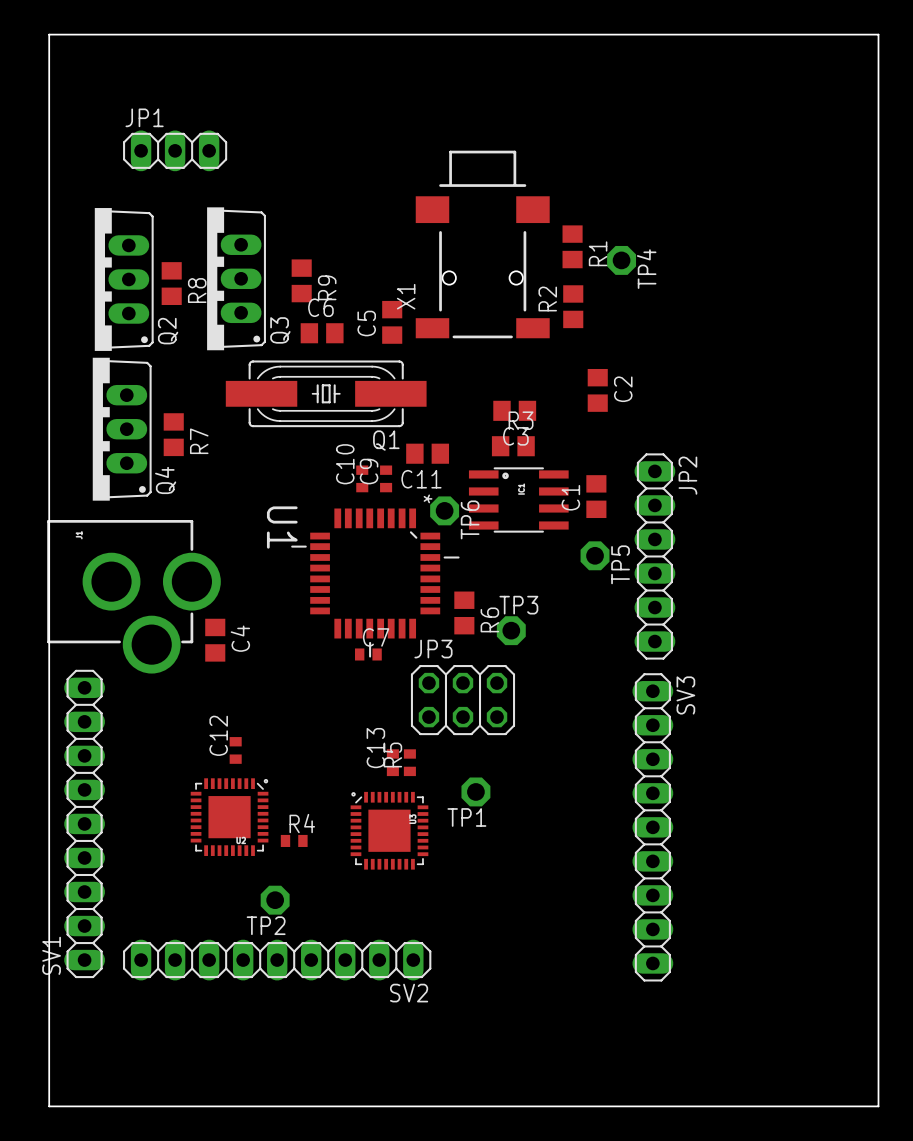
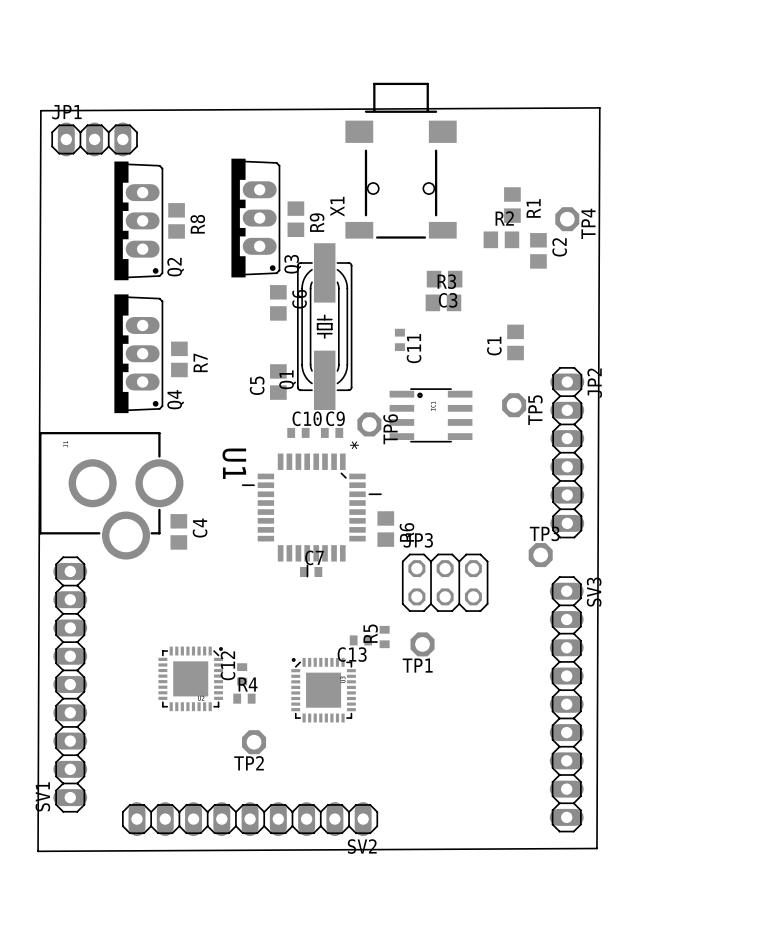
board edge: (49, 34) (878, 34) (878, 1106) (49, 1106) (49, 34) -> (599, 107) (40, 110) (38, 851) (596, 848) (599, 107)
JP1 position: (175, 150) -> (94, 139)
X1 position: (482, 244) -> (401, 160)
R1 position: (572, 246) -> (512, 205)
TP4 position: (621, 260) -> (567, 219)
Q3 position: (236, 278) -> (255, 218)
Q2 position: (124, 279) -> (138, 220)
R9 position: (301, 280) -> (295, 219)
R8 position: (171, 283) -> (176, 220)
R2 rotation: 0° (573, 306) -> 90° clockwise (501, 239)
R2 position: (573, 306) -> (501, 239)
C5 position: (392, 322) -> (278, 382)
C6 rotation: 0° (322, 333) -> 90° clockwise (278, 302)
C6 position: (322, 333) -> (278, 302)
C2 position: (597, 390) -> (538, 250)
Q1 rotation: 0° (326, 393) -> 90° clockwise (324, 326)
C3 position: (514, 410) -> (444, 279)
Q4 position: (122, 429) -> (138, 353)
R7 position: (173, 434) -> (179, 359)
C11 footprint: [406, 443, 450, 464] -> [394, 328, 405, 352]
R3 position: (513, 446) -> (443, 302)
C10 rotation: 0° (362, 478) -> 90° clockwise (298, 432)
C10 position: (362, 478) -> (298, 432)
C9 rotation: 0° (386, 478) -> 90° clockwise (332, 432)
C9 position: (386, 478) -> (332, 432)
C11 name position: C11 (421, 479) -> C11 (414, 348)
C1 position: (596, 496) -> (515, 342)
TP5 position: (595, 555) -> (514, 405)
JP2 position: (654, 556) -> (567, 452)
U1 position: (375, 583) -> (311, 515)
R6 position: (464, 612) -> (385, 529)
TP3 position: (511, 630) -> (540, 555)
C7 position: (368, 654) -> (311, 572)
JP3 position: (462, 700) -> (445, 582)
C13 name position: C13 (375, 748) -> C13 (352, 654)
C12 position: (235, 750) -> (242, 674)
C13 rotation: 0° (392, 762) -> 90° clockwise (360, 640)
C13 position: (392, 762) -> (360, 640)
R5 position: (409, 762) -> (384, 637)
TP1 position: (475, 791) -> (422, 644)
SV3 position: (652, 827) -> (566, 704)
TP2 position: (275, 900) -> (254, 742)
SV2 position: (277, 960) -> (250, 819)

